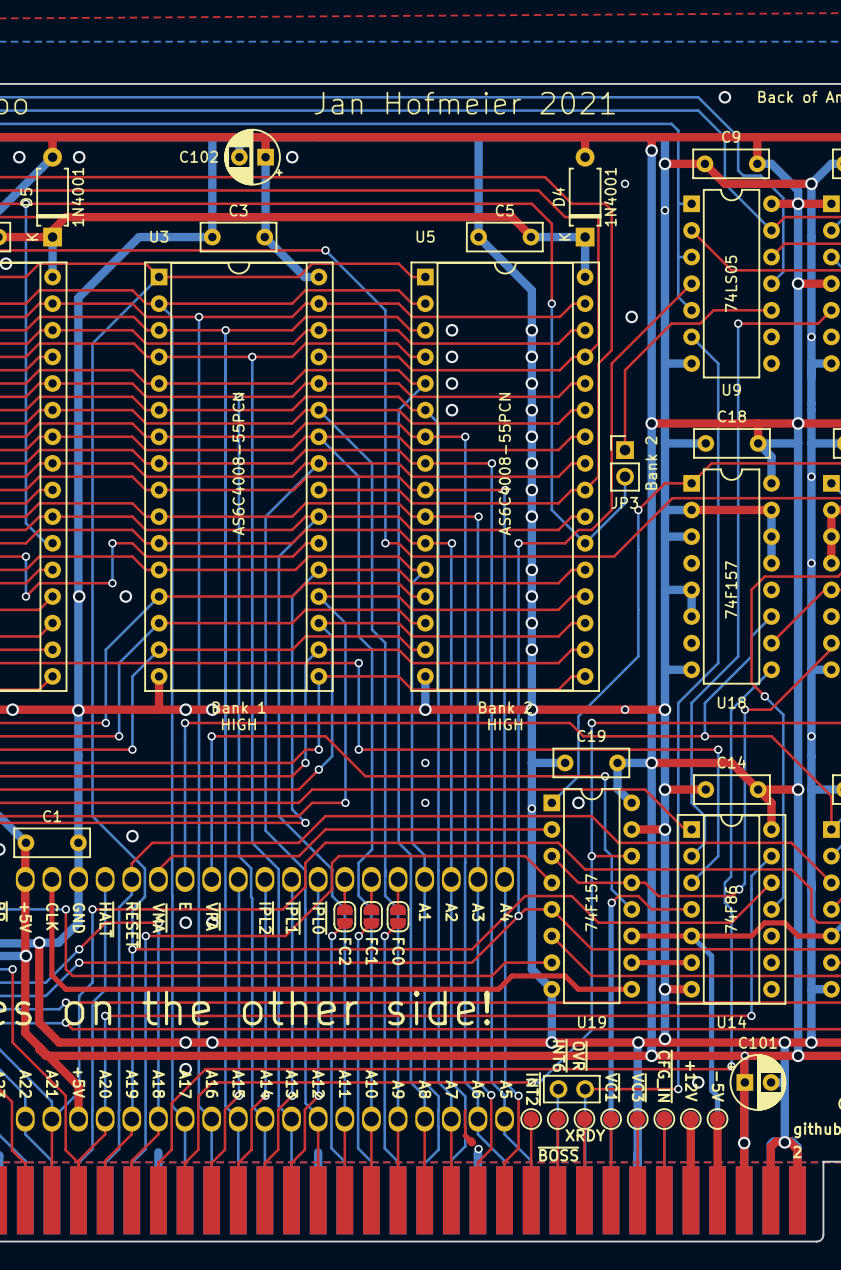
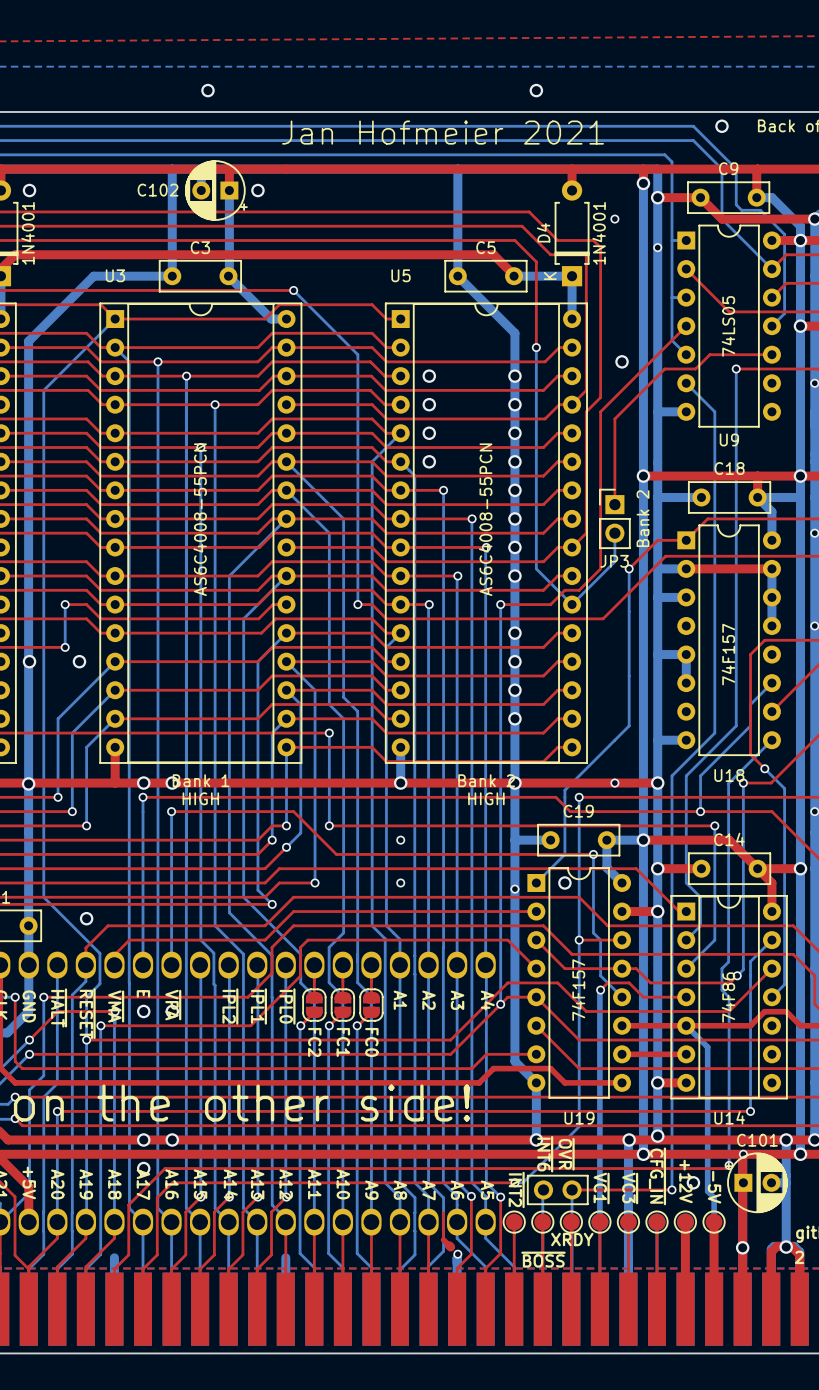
via: none -> (207, 90)
via: none -> (536, 90)

